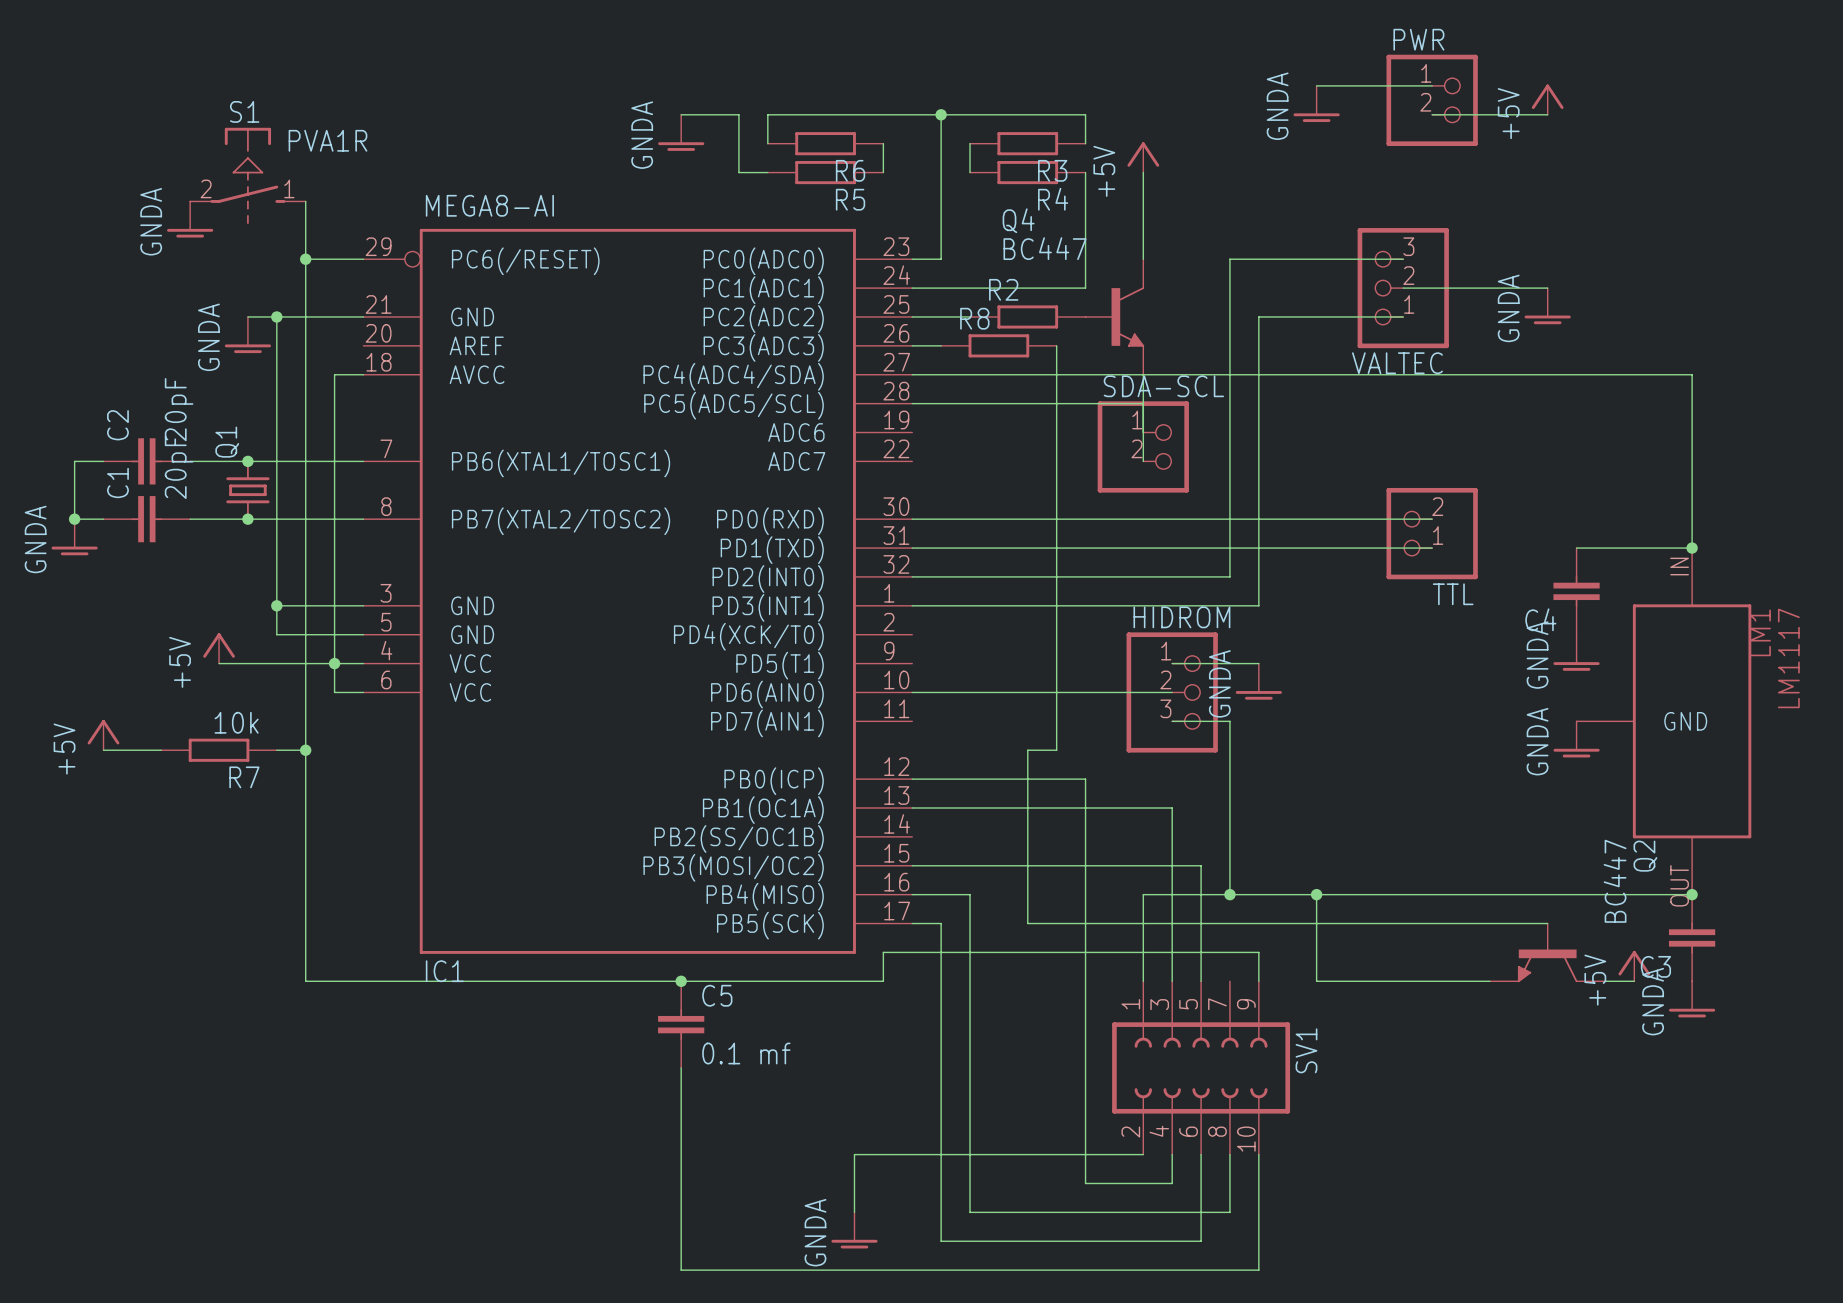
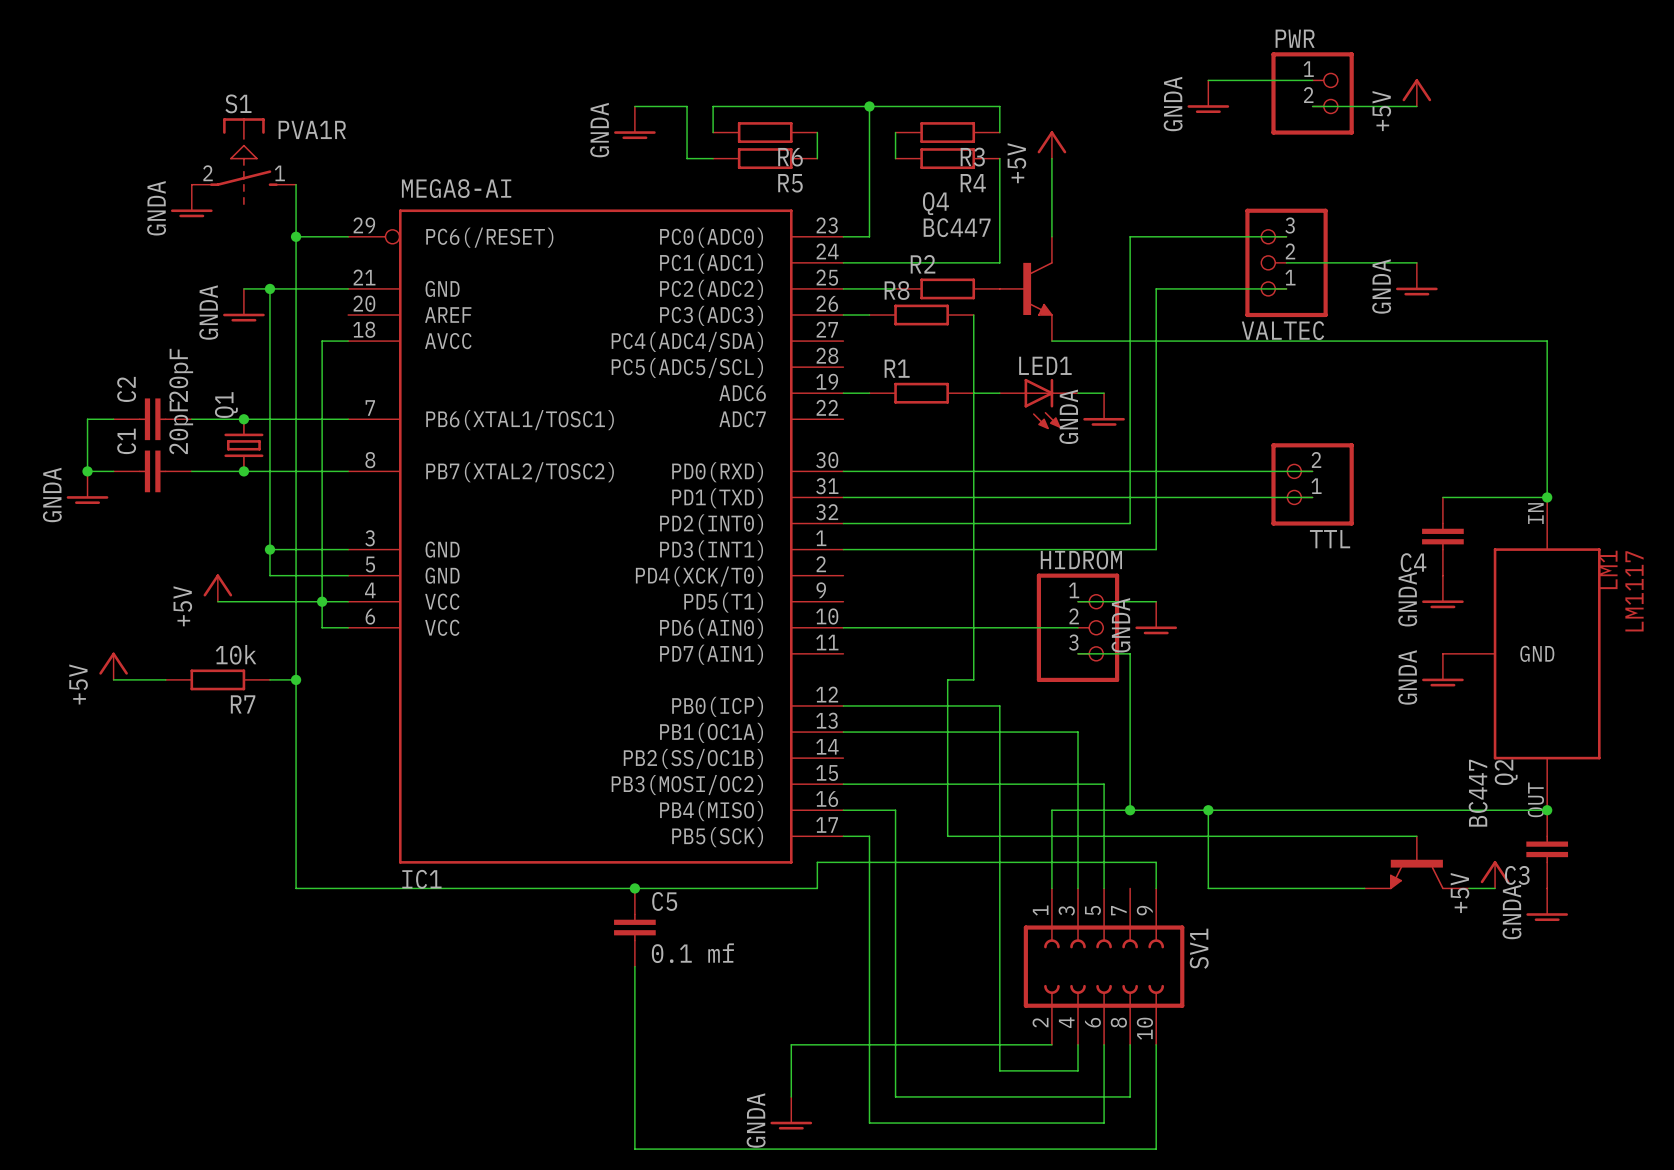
wire: (912, 374) (1143, 374) (1143, 461) -> none
wire: (912, 403) (1143, 403) -> none
wire: none -> (843, 393) (869, 393)
R1: none -> (921, 393)
wire: none -> (973, 393) (999, 393)
wire: none -> (1078, 393) (1104, 393)
LED1: none -> (1038, 404)
SDA-SCL: (1143, 446) -> none
power symbol: none -> GNDA (1104, 409)

